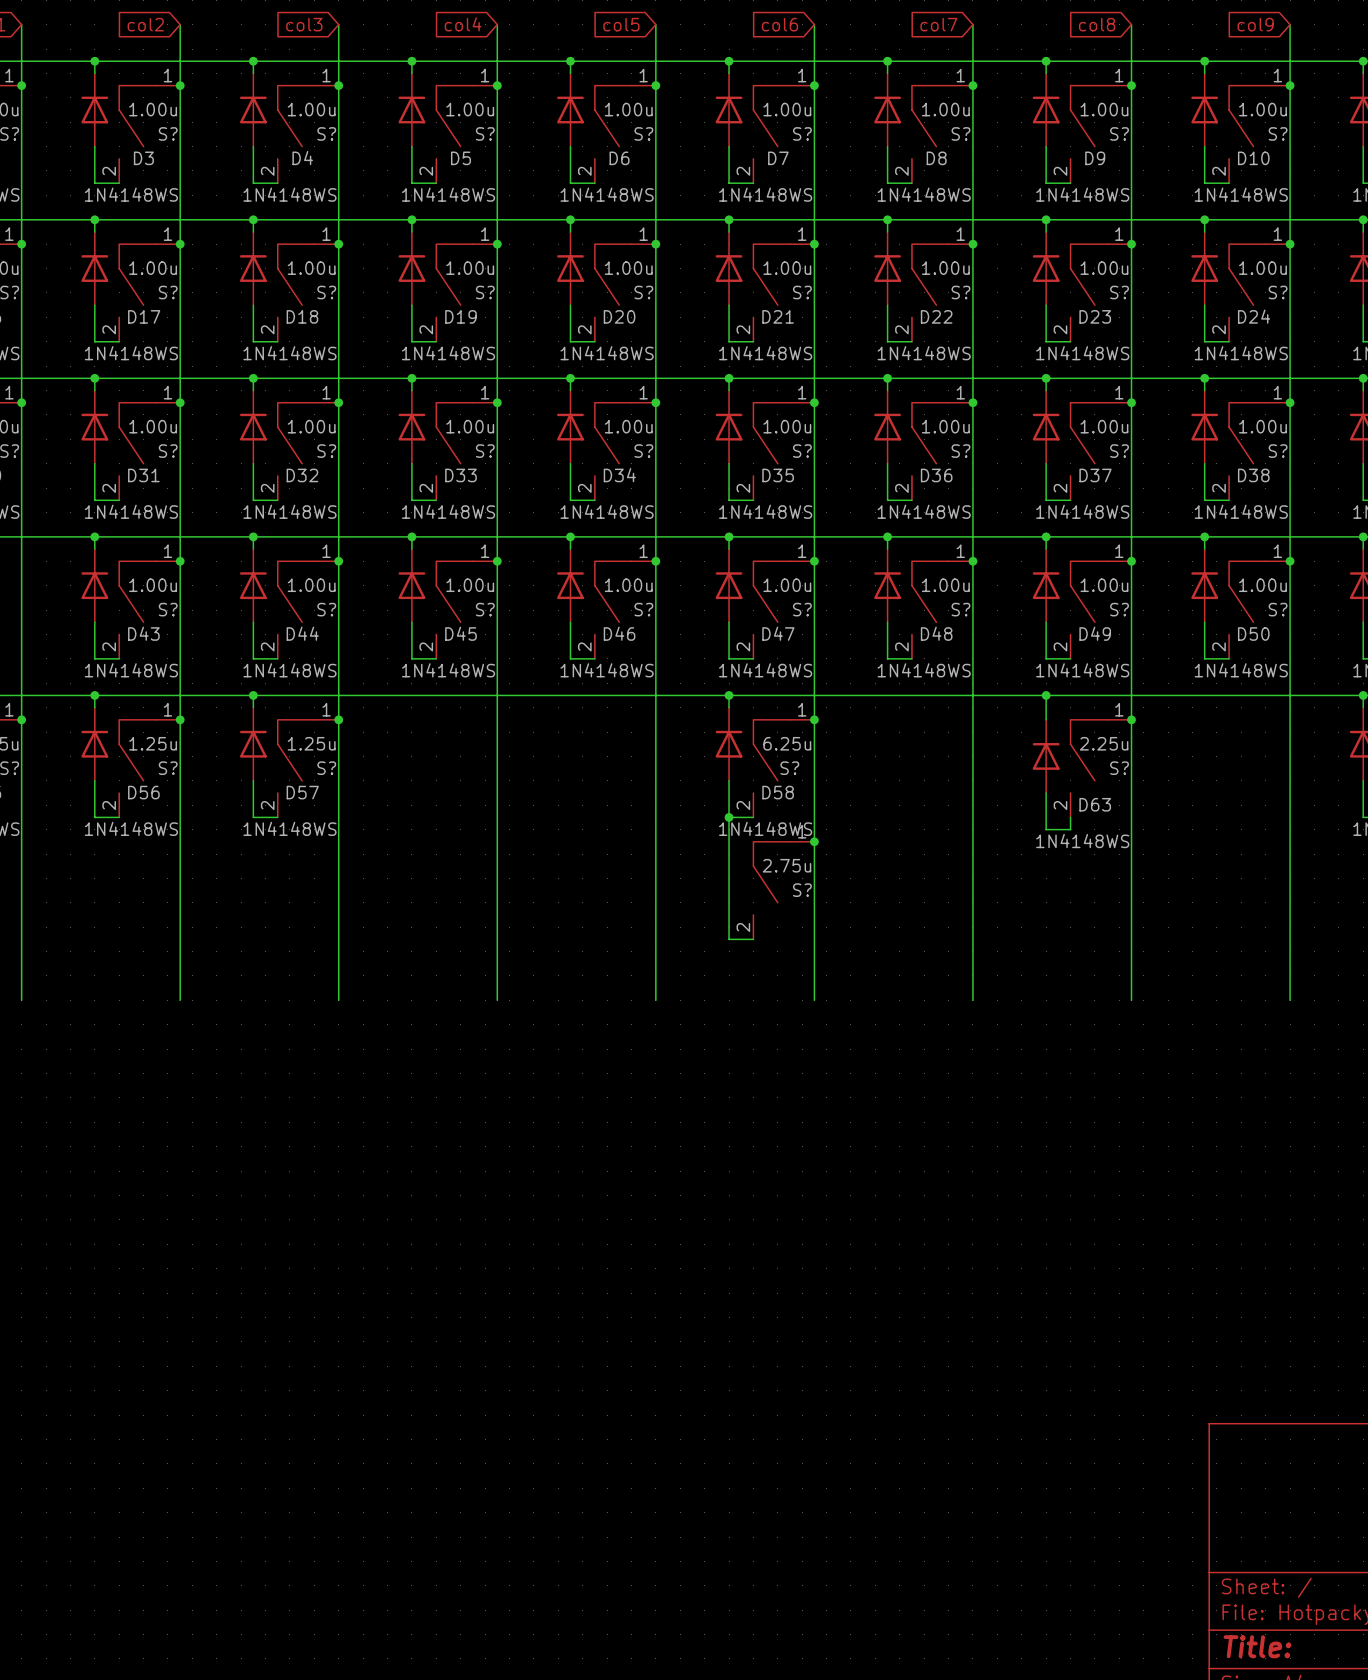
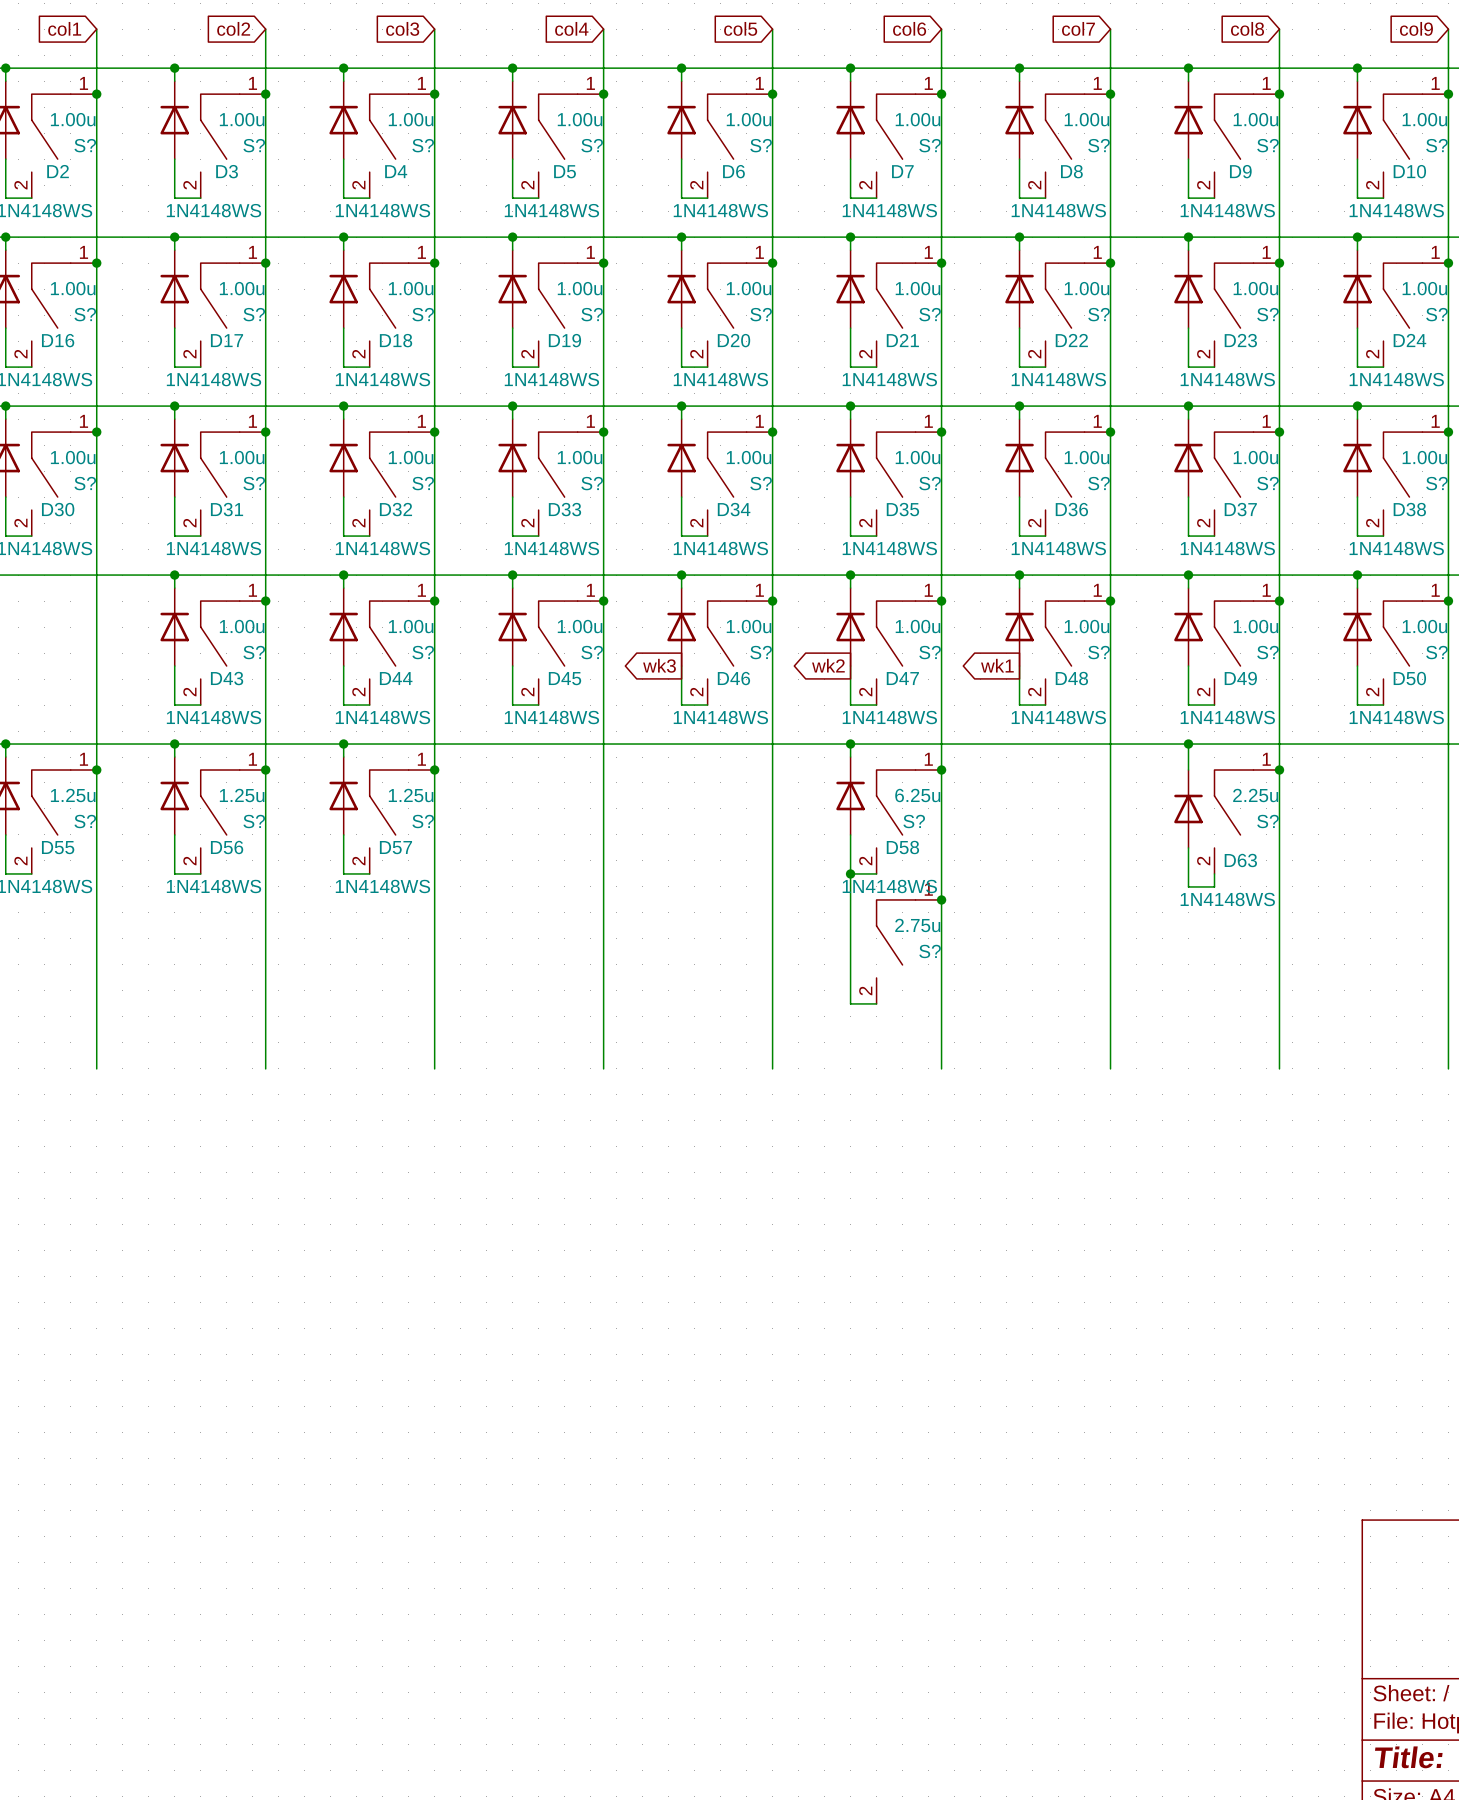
global label: none -> wk3 (659, 665)
global label: none -> wk2 (828, 665)
global label: none -> wk1 (997, 665)

